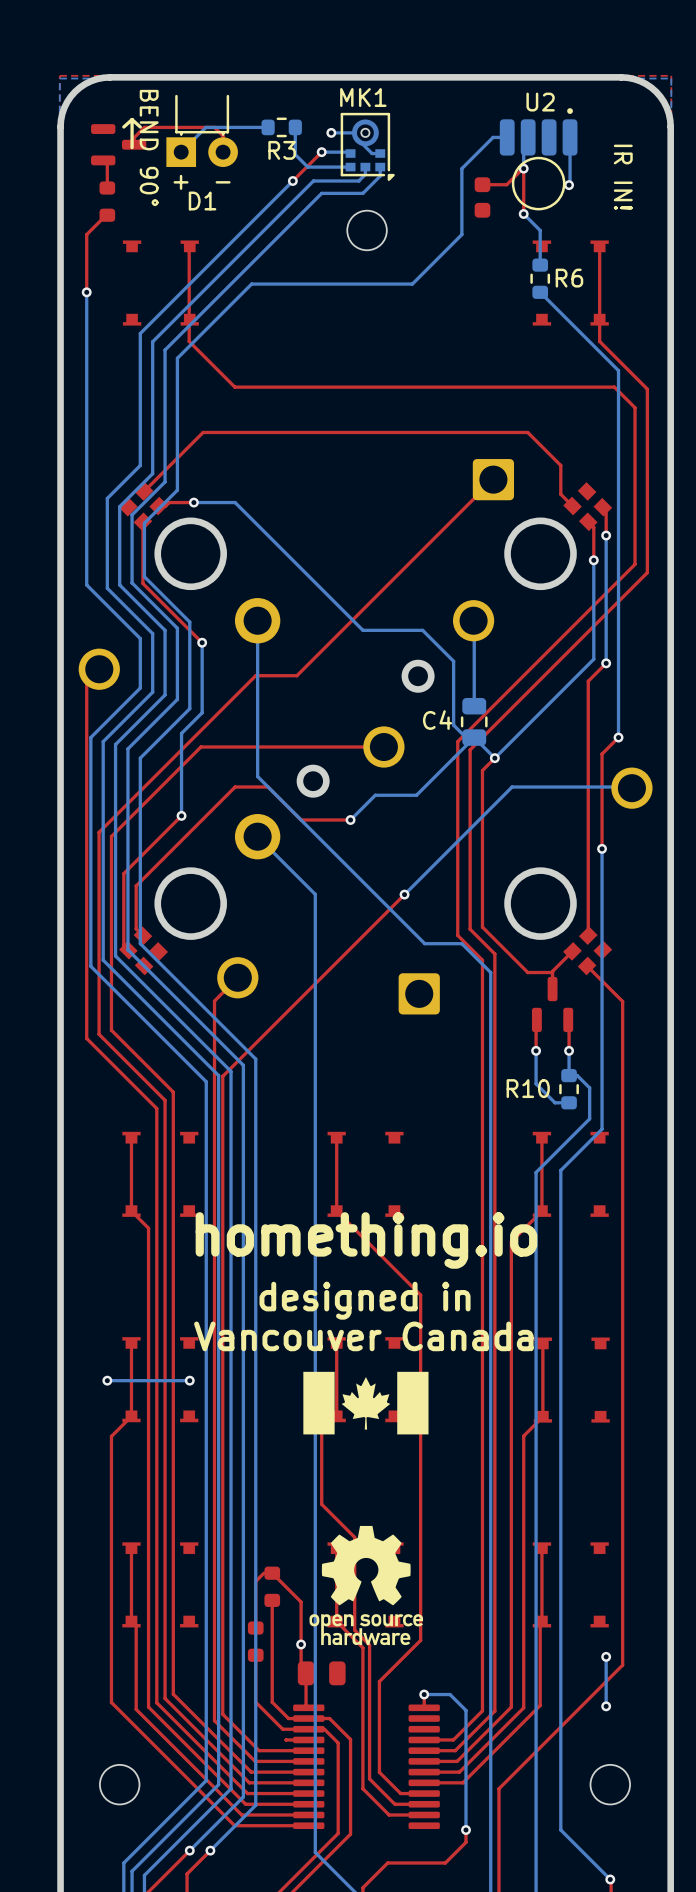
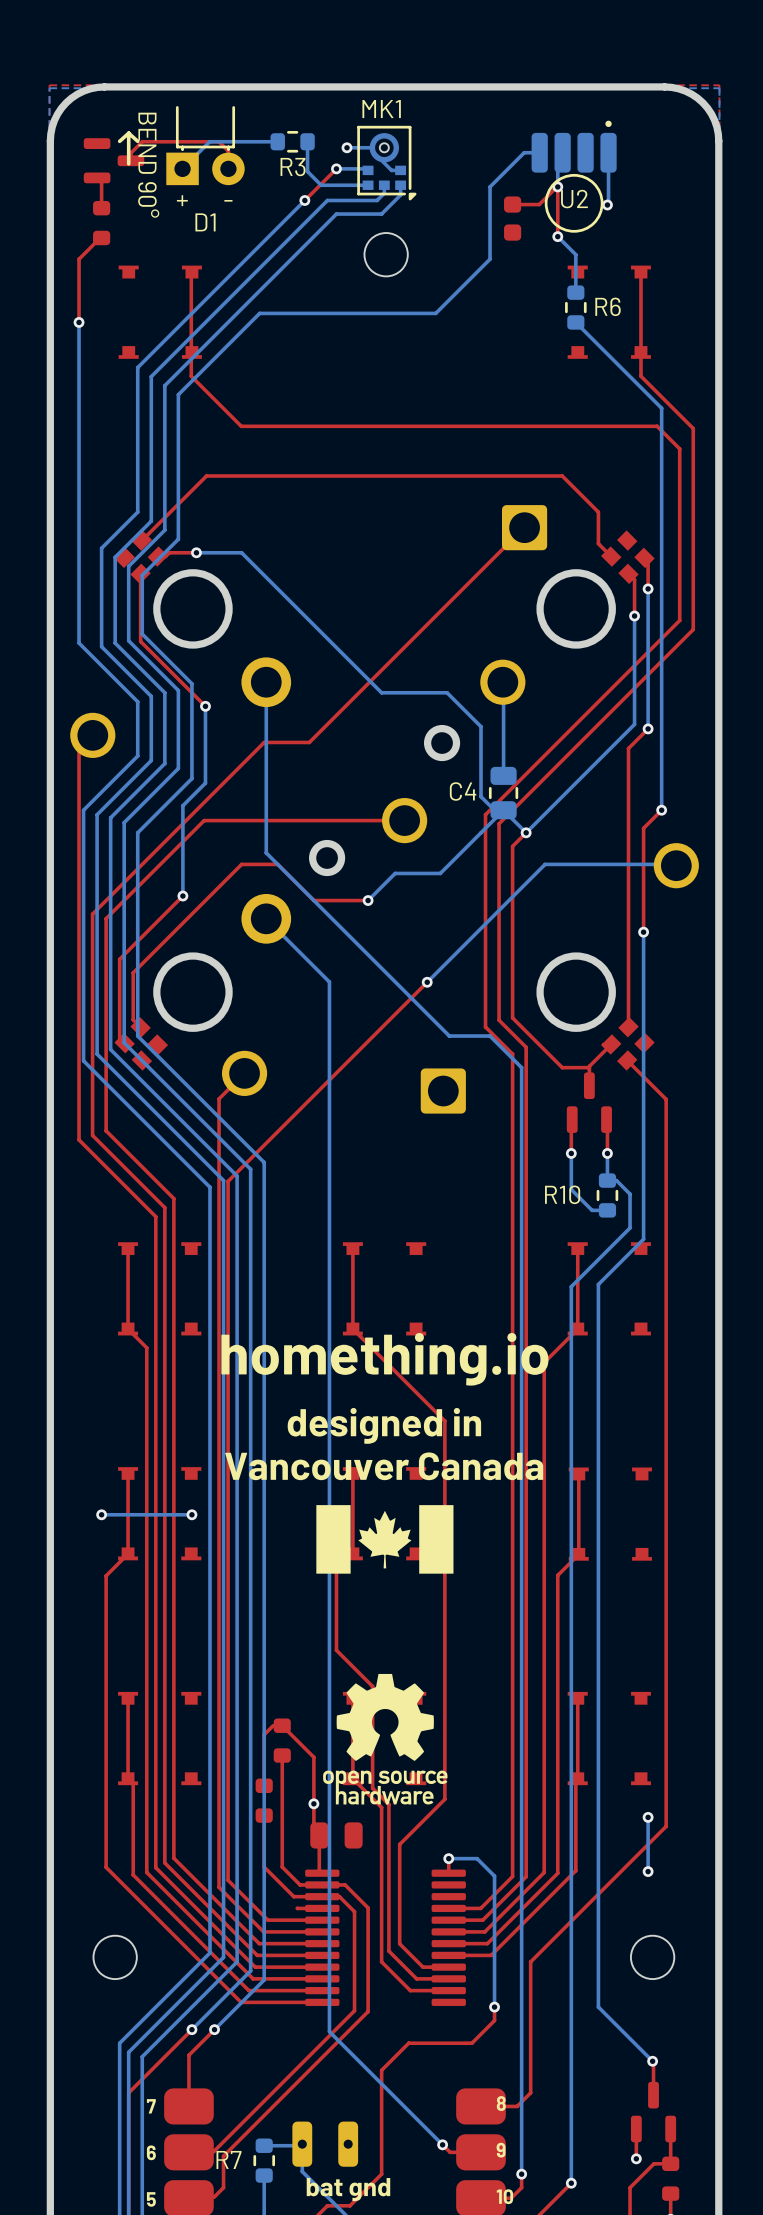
U2 name position: U2 (540, 102) -> U2 (574, 199)
text: IR IN! (623, 177) -> none

